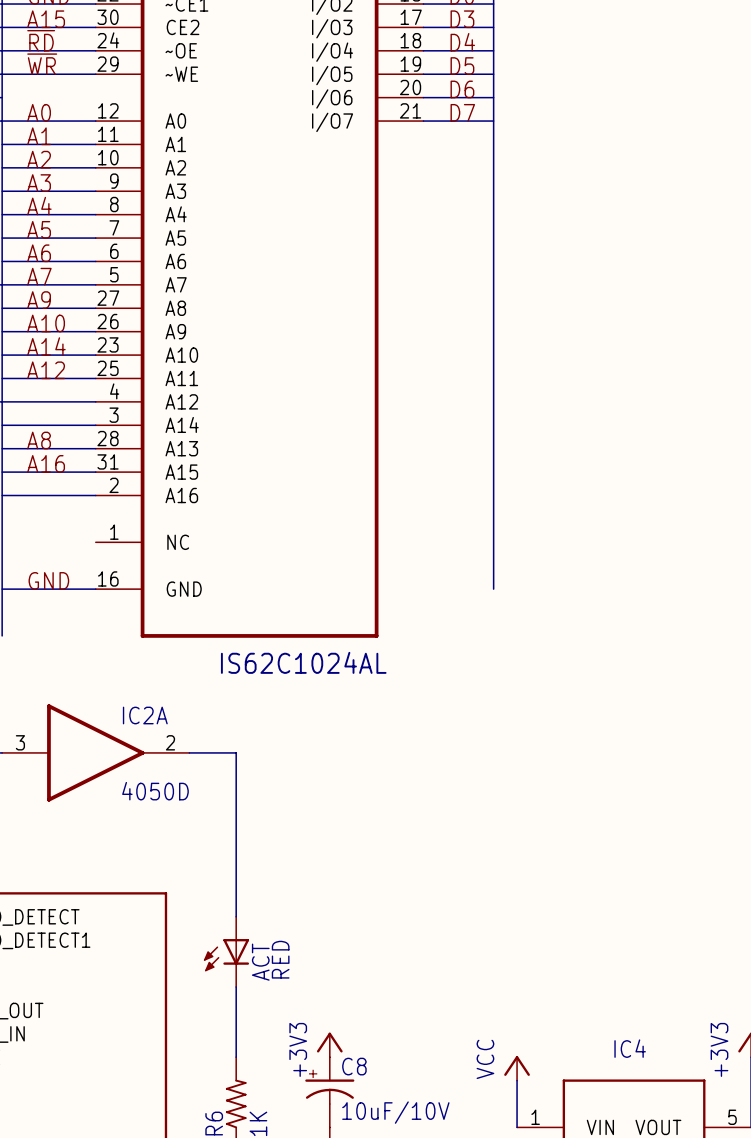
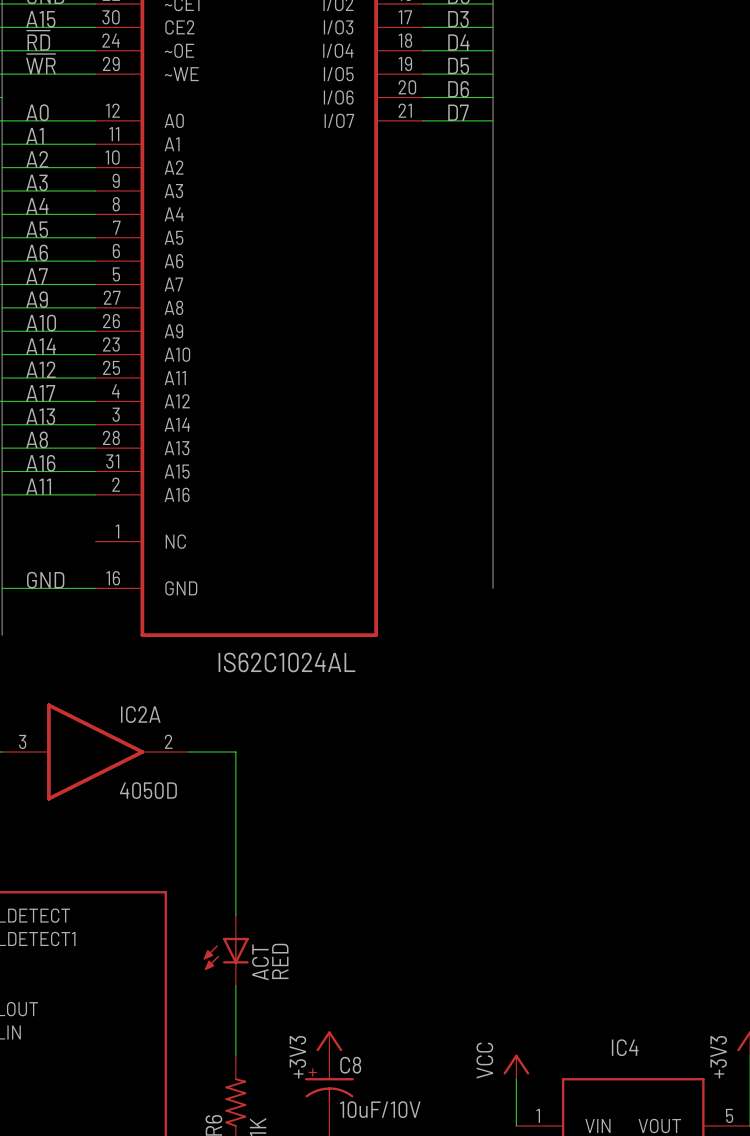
label: none -> A17 (40, 393)
label: none -> A13 (40, 416)
label: none -> A11 (38, 486)

